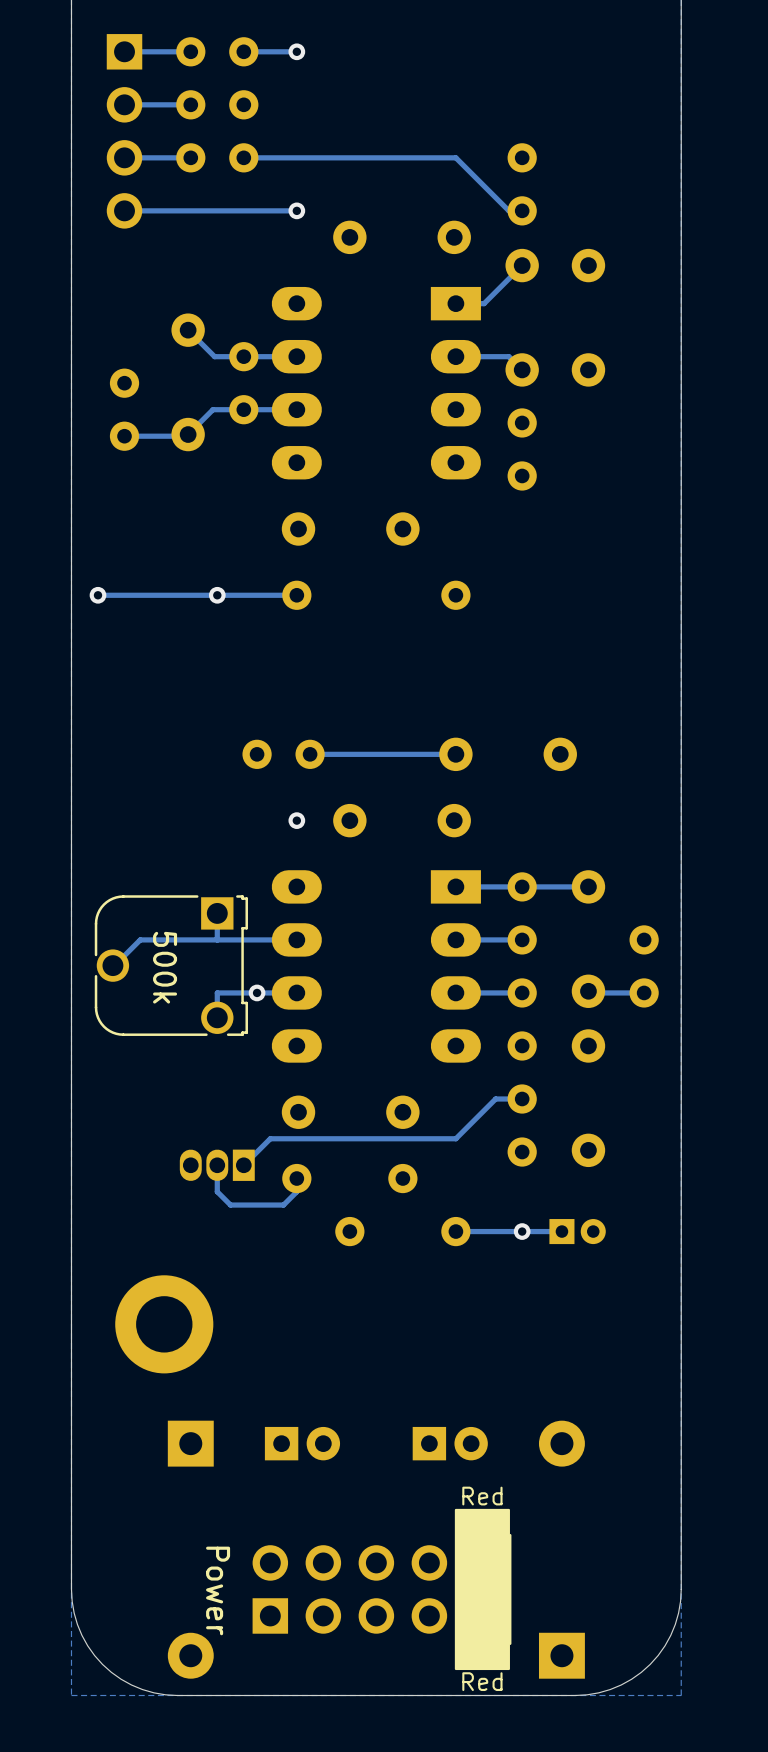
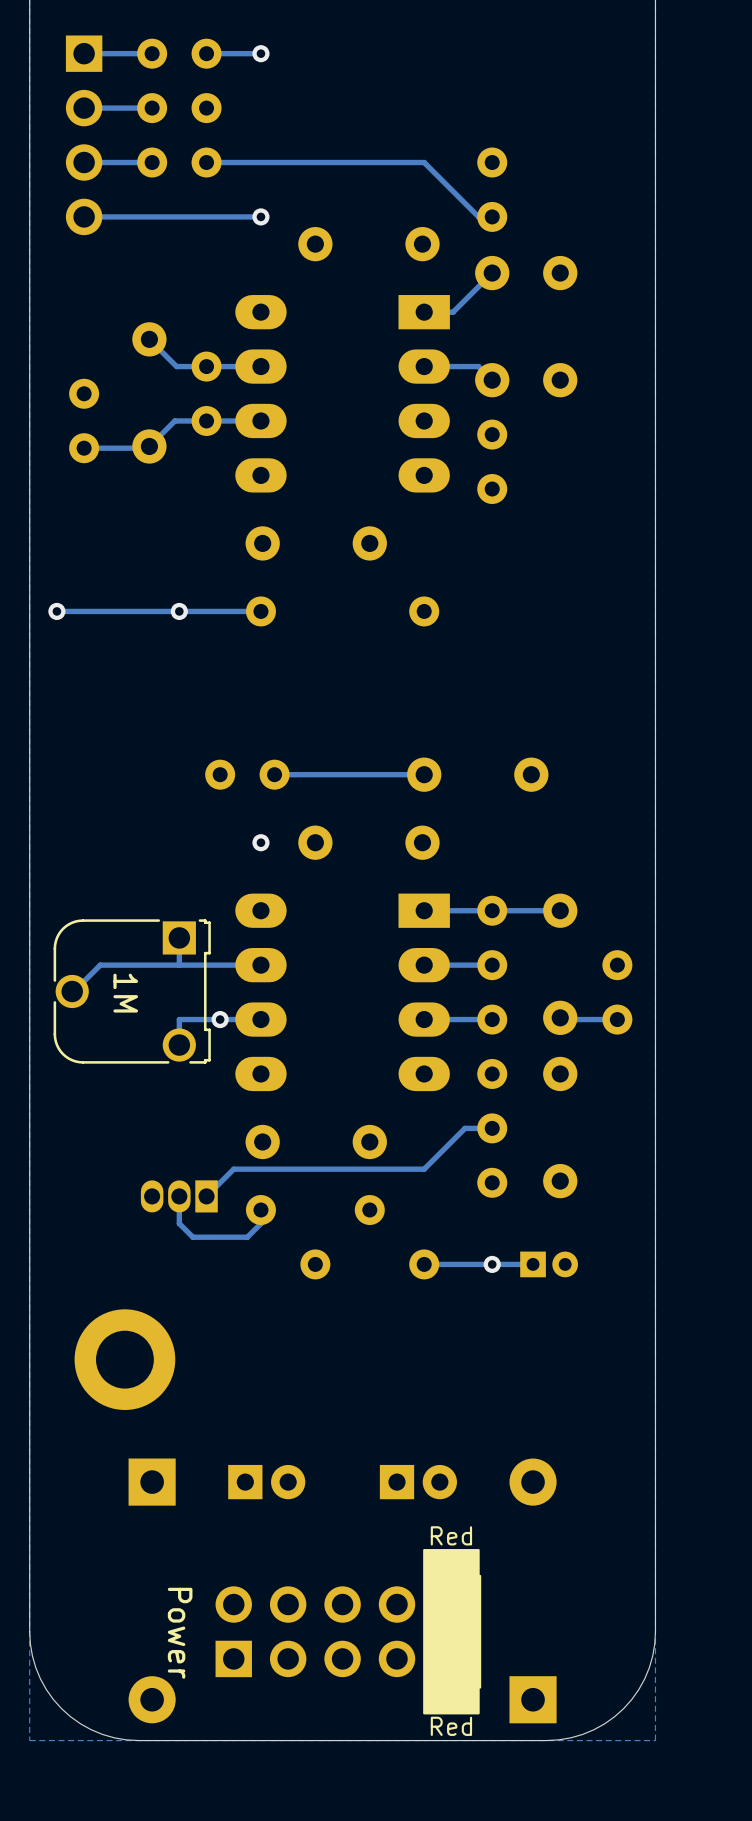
part value: 500k (165, 967) -> 1M (125, 993)

